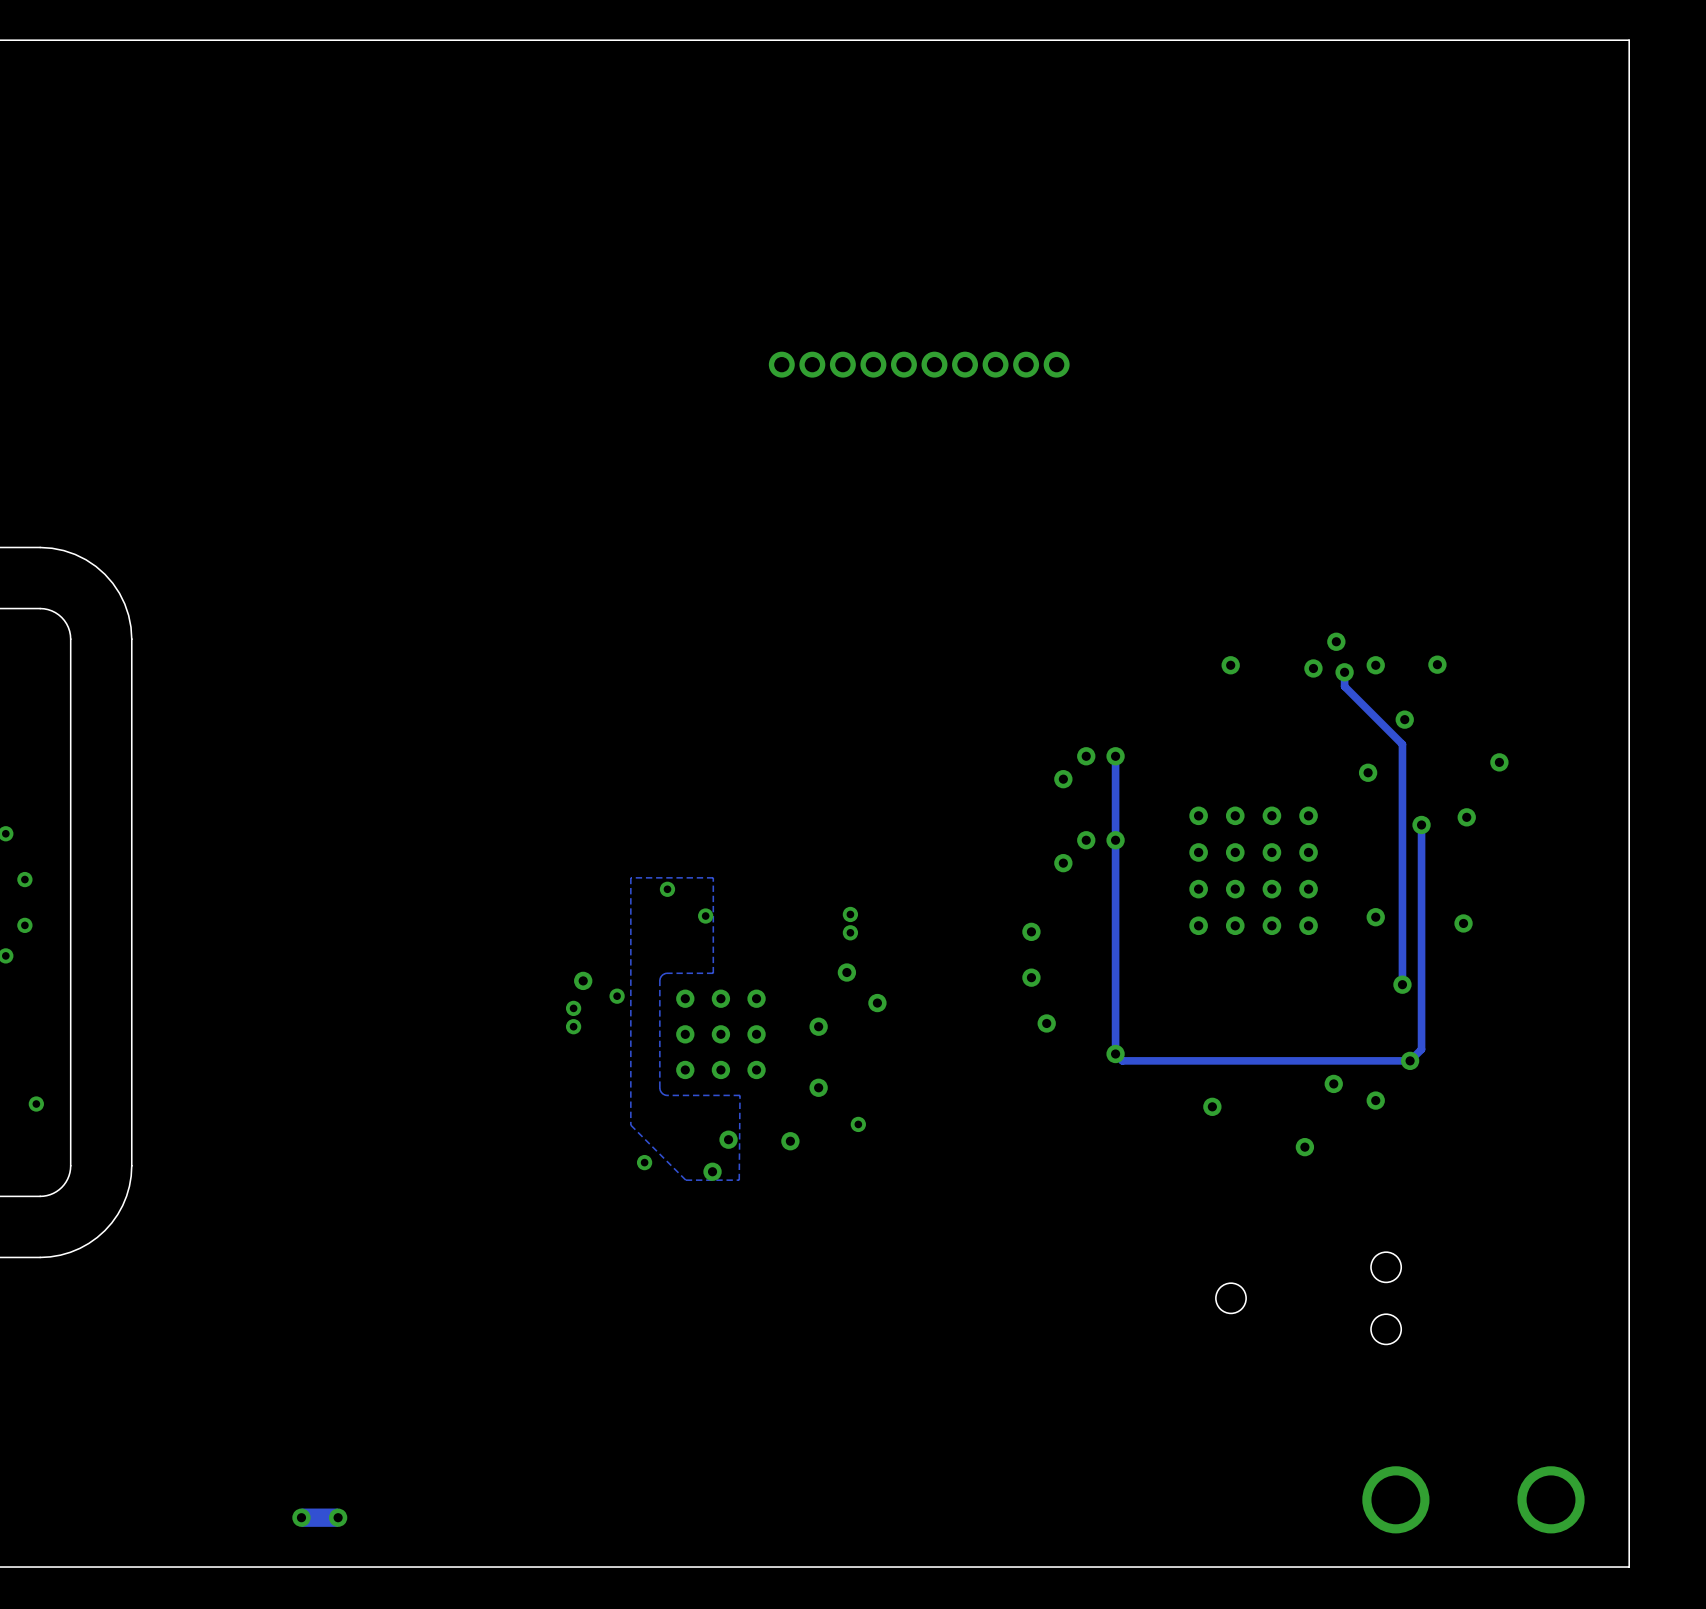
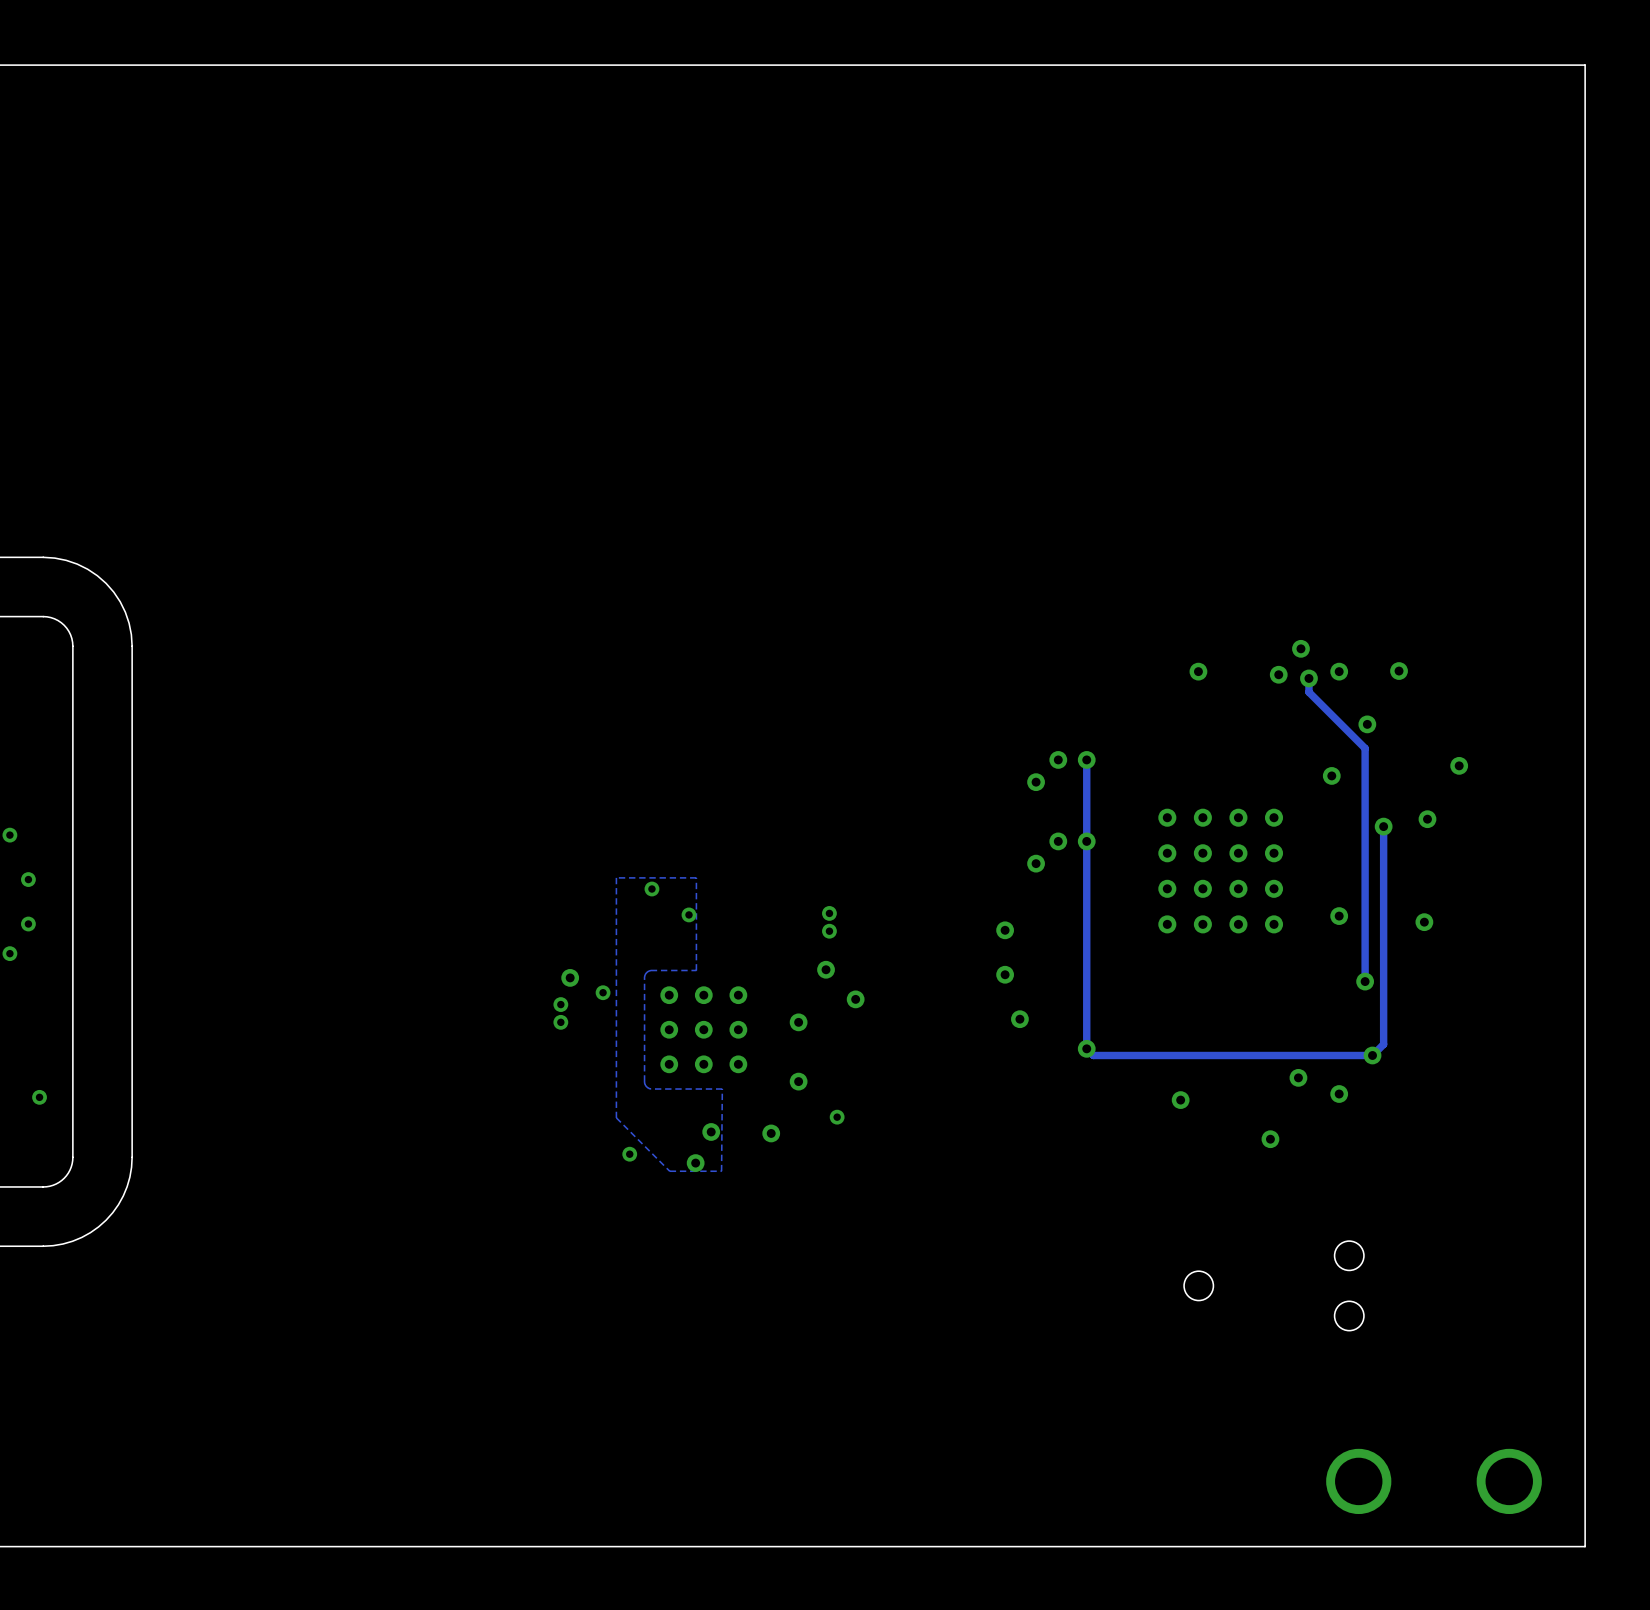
part: (919, 364) -> none
part: (319, 1517) -> none

